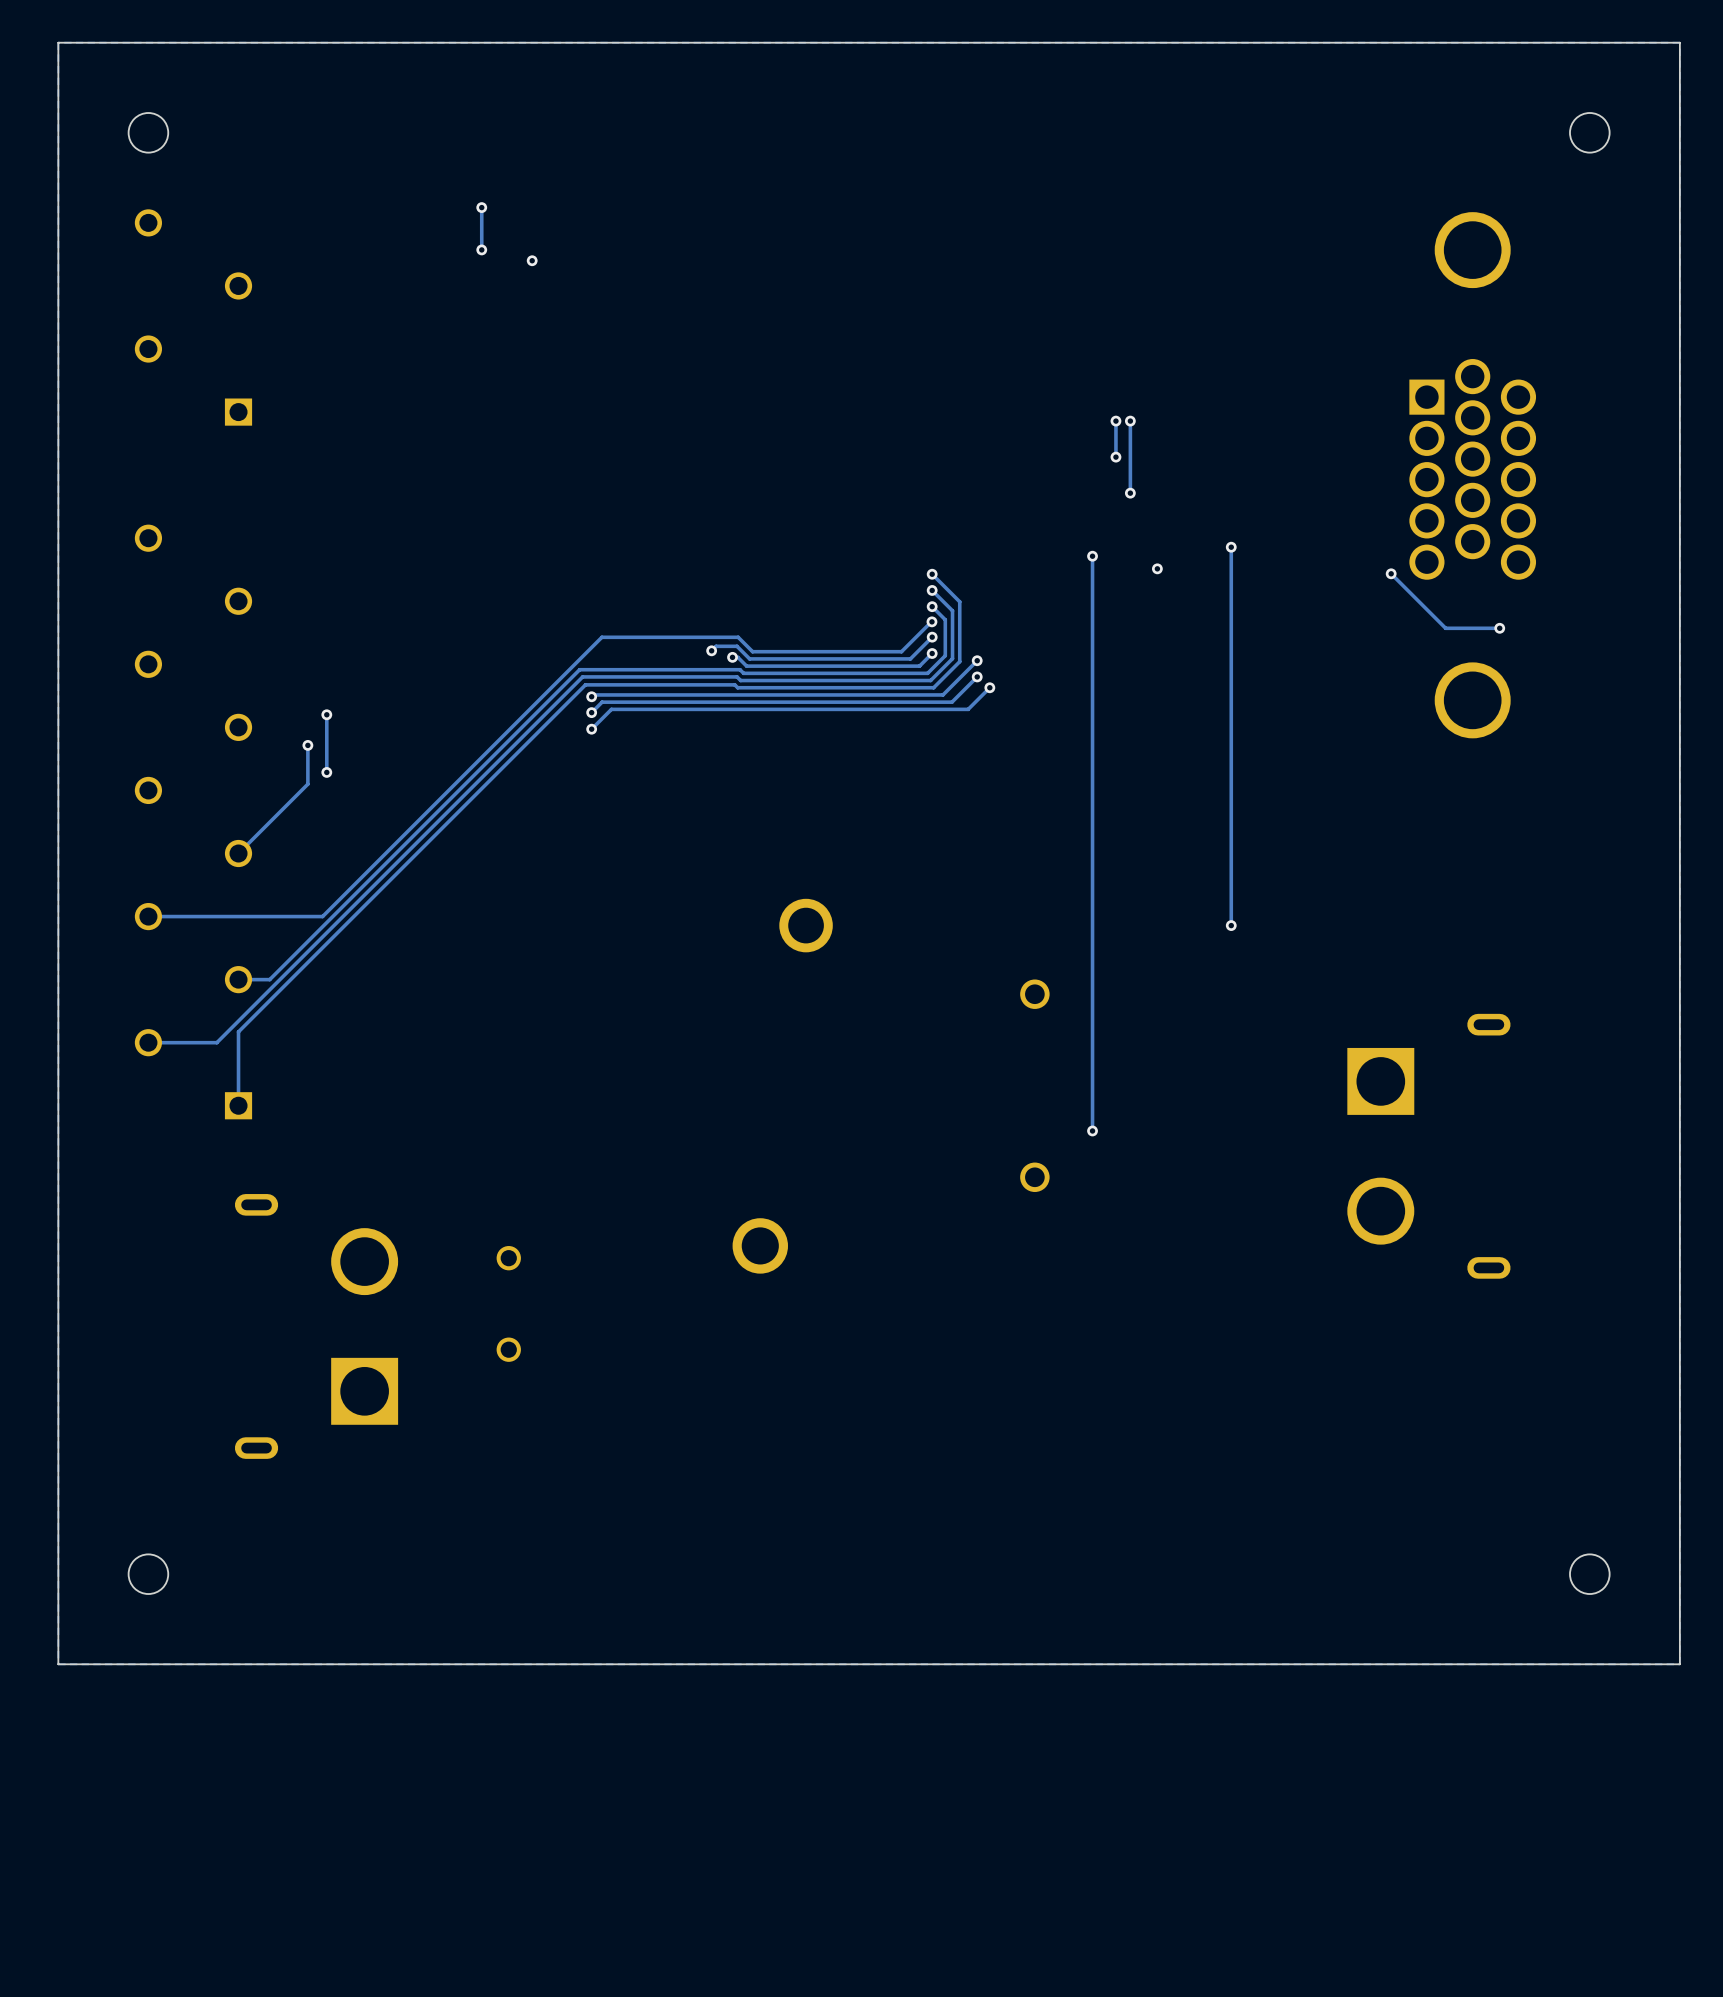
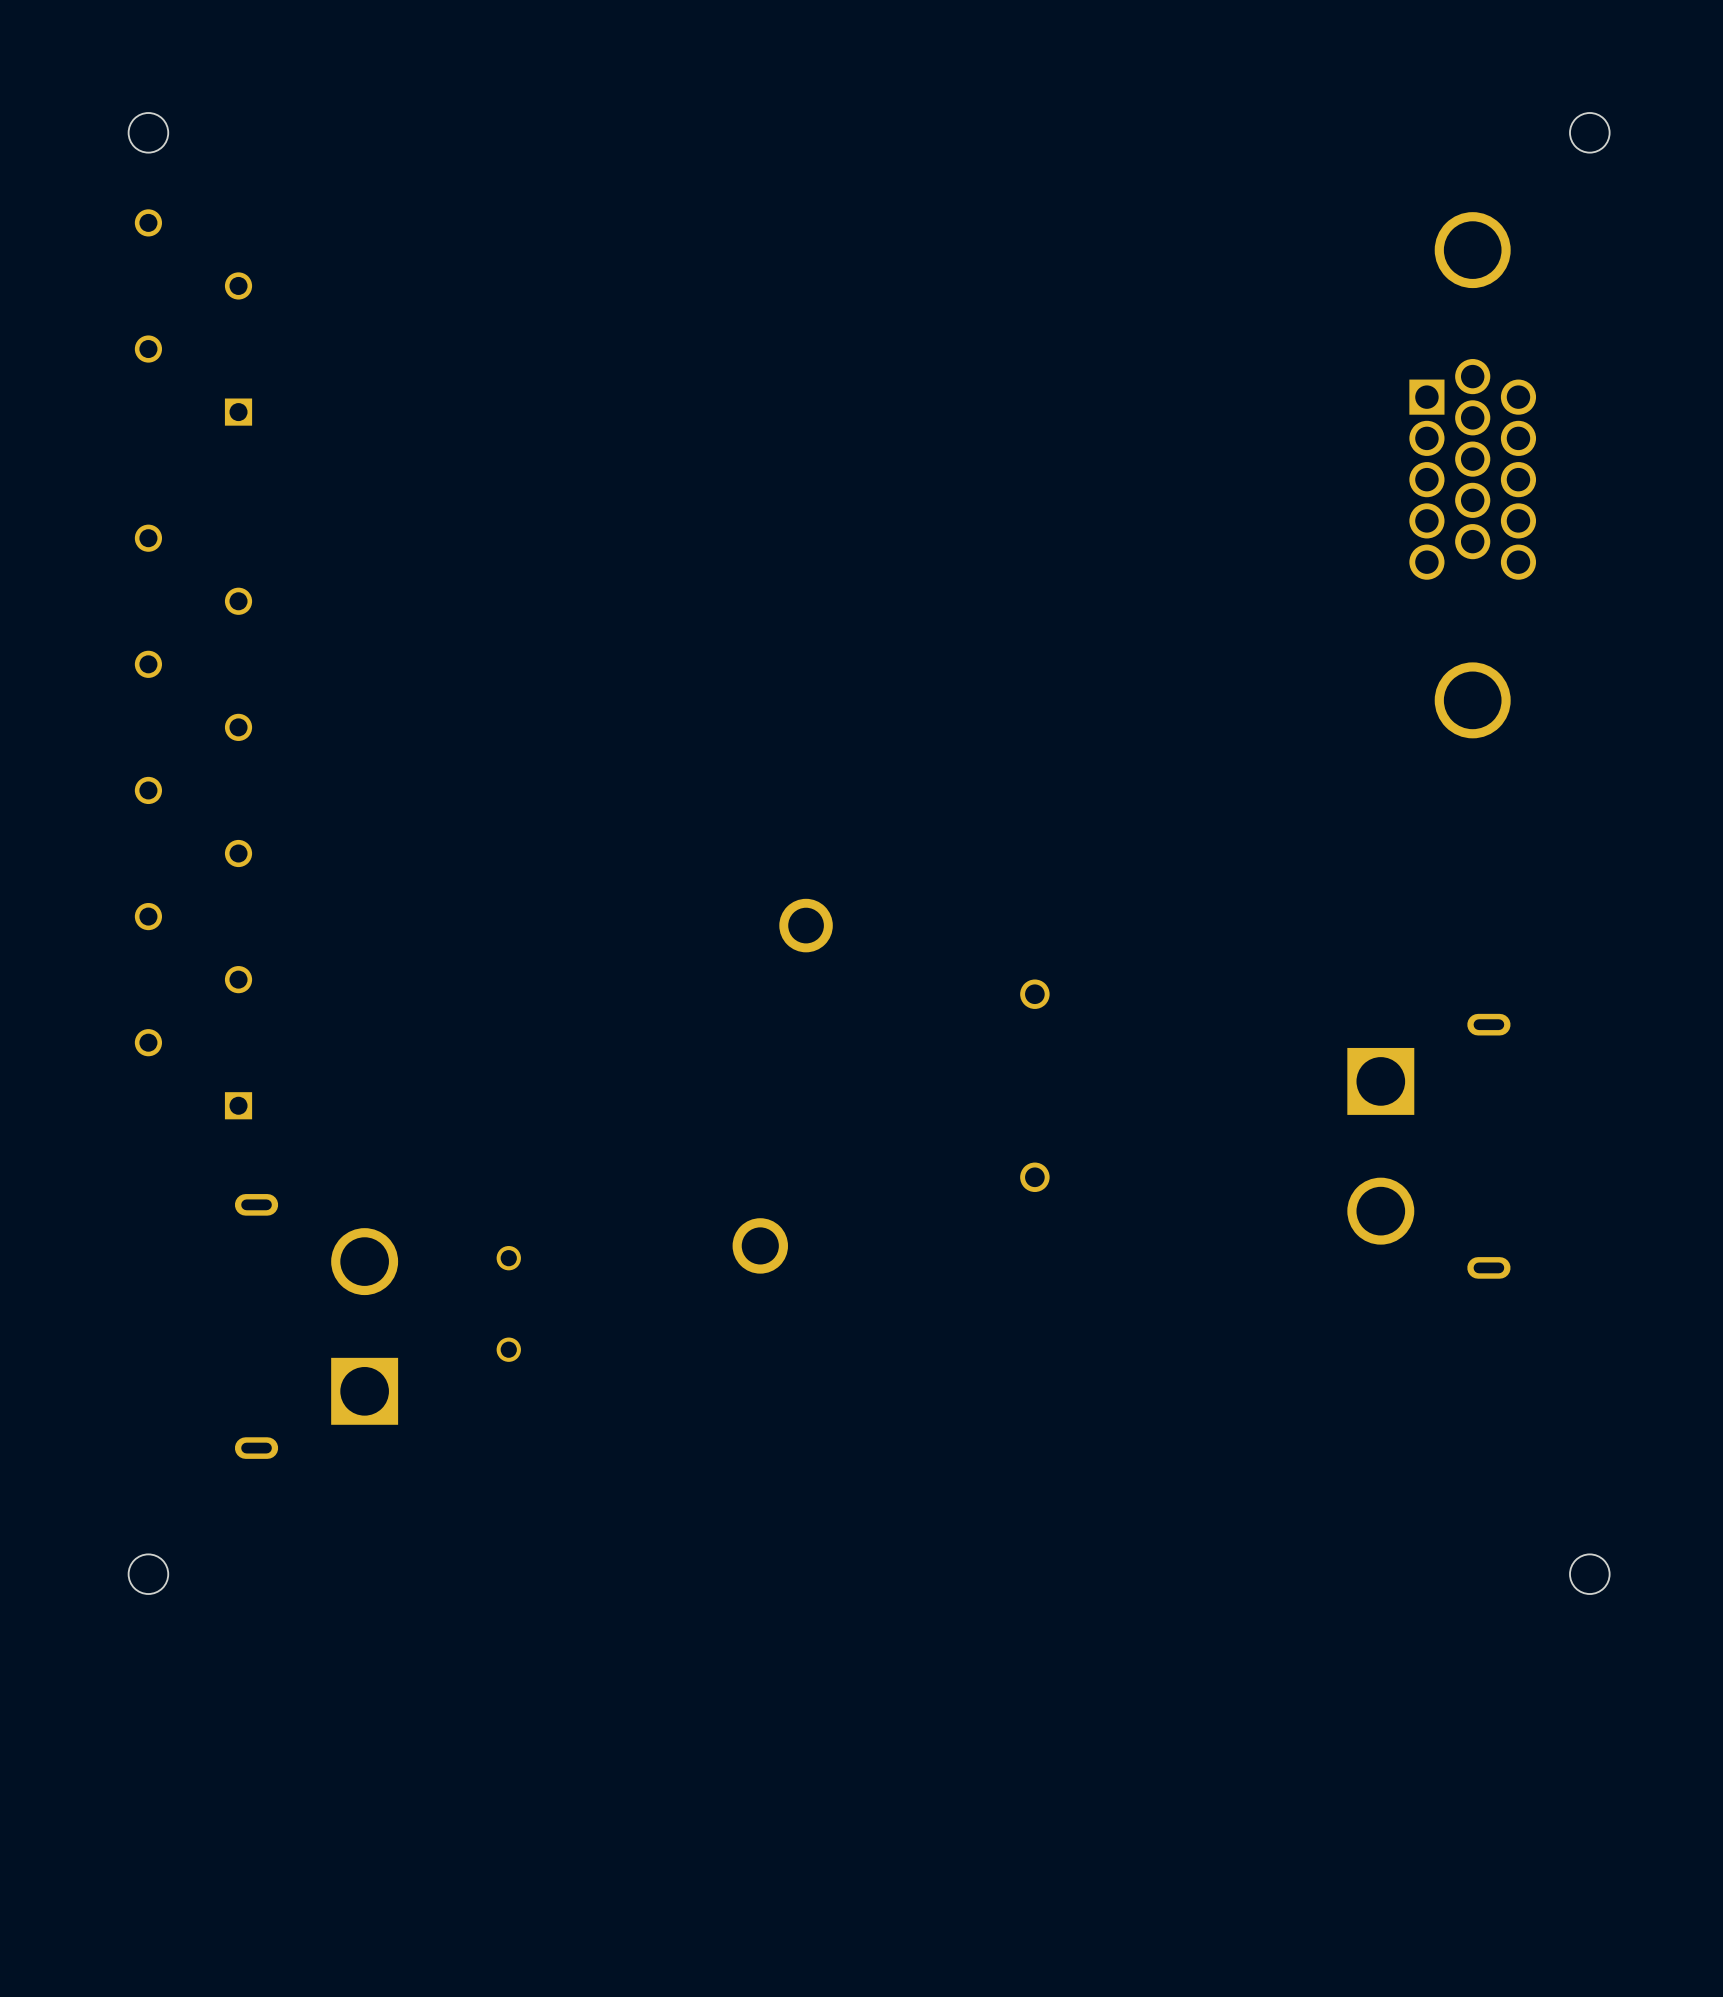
board edge: (1679, 42) (58, 42) (58, 1664) (1679, 1664) (1679, 42) -> none
track: (481, 207) (481, 249) -> none
via: (481, 207) -> none
via: (481, 249) -> none
via: (532, 260) -> none
track: (1115, 421) (1115, 457) -> none
via: (1115, 421) -> none
track: (1130, 421) (1130, 493) -> none
via: (1130, 421) -> none
via: (1115, 457) -> none
via: (1130, 493) -> none
track: (1231, 547) (1231, 925) -> none
via: (1231, 547) -> none
track: (1092, 556) (1092, 1130) -> none
via: (1092, 556) -> none
via: (1157, 568) -> none
track: (1391, 573) (1445, 628) (1499, 628) -> none
via: (1391, 573) -> none
track: (932, 574) (959, 601) (959, 661) (933, 687) (737, 687) (734, 684) (585, 684) (238, 1031) (238, 1105) -> none
via: (932, 574) -> none
track: (932, 590) (952, 610) (952, 658) (930, 680) (740, 680) (737, 676) (582, 676) (216, 1042) (148, 1042) -> none
via: (932, 590) -> none
track: (932, 606) (945, 619) (945, 655) (927, 673) (743, 673) (740, 669) (579, 669) (269, 979) (238, 979) -> none
via: (932, 606) -> none
track: (931, 621) (930, 620) (930, 622) (901, 651) (752, 651) (738, 637) (601, 637) (322, 916) (148, 916) -> none
via: (931, 621) -> none
via: (1499, 628) -> none
track: (932, 637) (910, 658) (749, 658) (737, 646) (716, 646) (711, 650) -> none
via: (932, 637) -> none
via: (711, 650) -> none
track: (932, 653) (919, 666) (746, 666) (737, 657) (732, 657) -> none
via: (932, 653) -> none
via: (732, 657) -> none
track: (977, 660) (942, 694) (593, 694) (591, 696) -> none
via: (977, 660) -> none
track: (977, 676) (952, 702) (602, 702) (591, 712) -> none
via: (977, 676) -> none
track: (989, 687) (968, 709) (611, 709) (591, 729) -> none
via: (989, 687) -> none
via: (591, 696) -> none
via: (591, 712) -> none
track: (326, 714) (326, 772) -> none
via: (326, 714) -> none
via: (591, 729) -> none
track: (307, 745) (307, 784) (238, 853) -> none
via: (307, 745) -> none
via: (326, 772) -> none
via: (1231, 925) -> none
via: (1092, 1130) -> none

